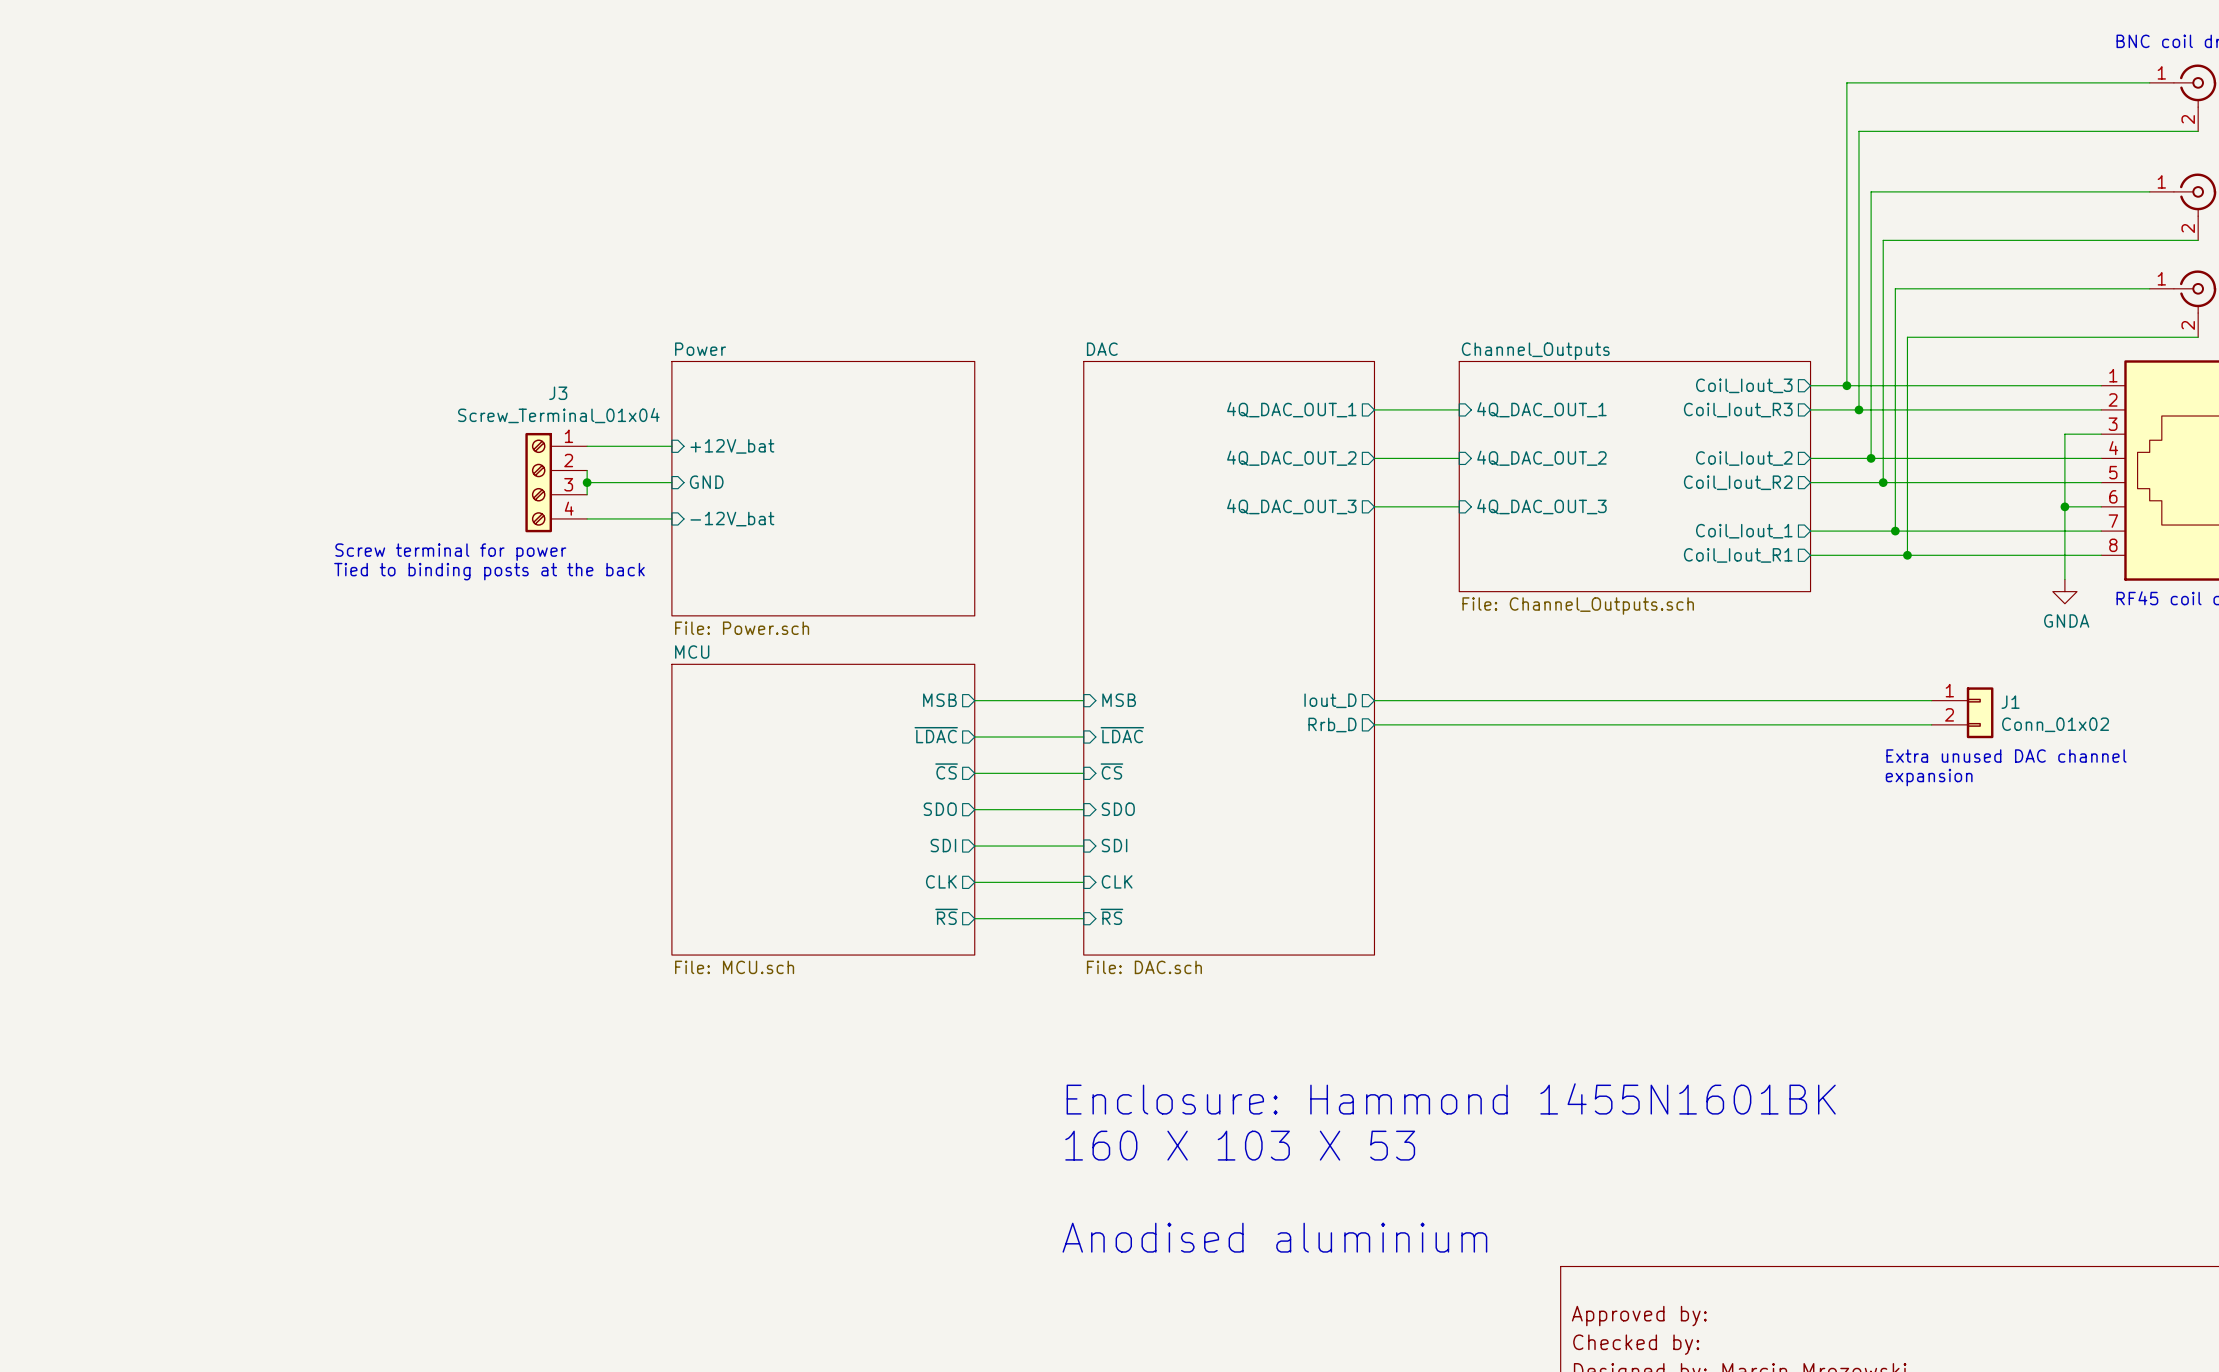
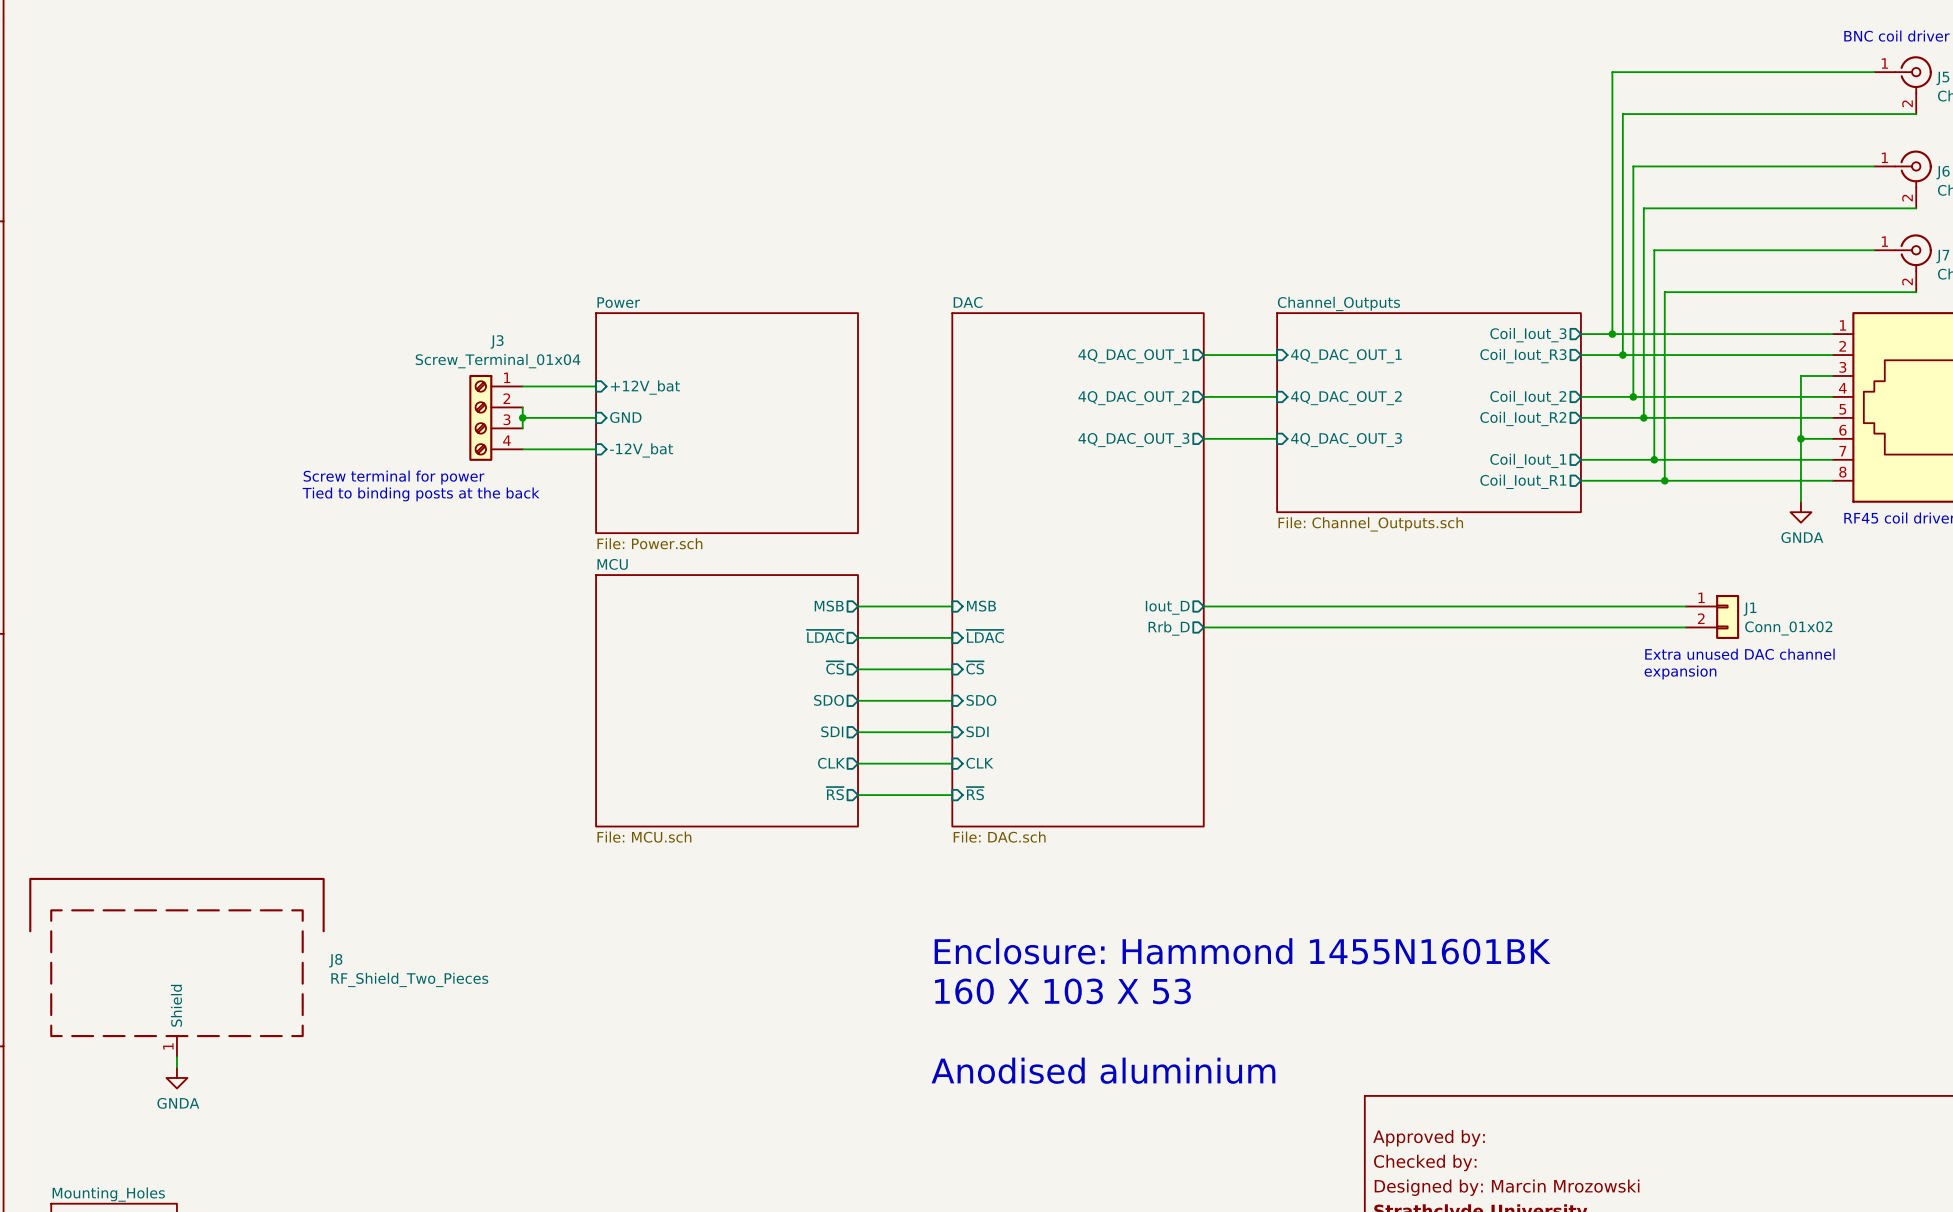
J8: none -> RF_Shield_Two_Pieces (176, 967)
wire: none -> (176, 1057) (176, 1067)
power symbol: none -> GNDA (176, 1077)

